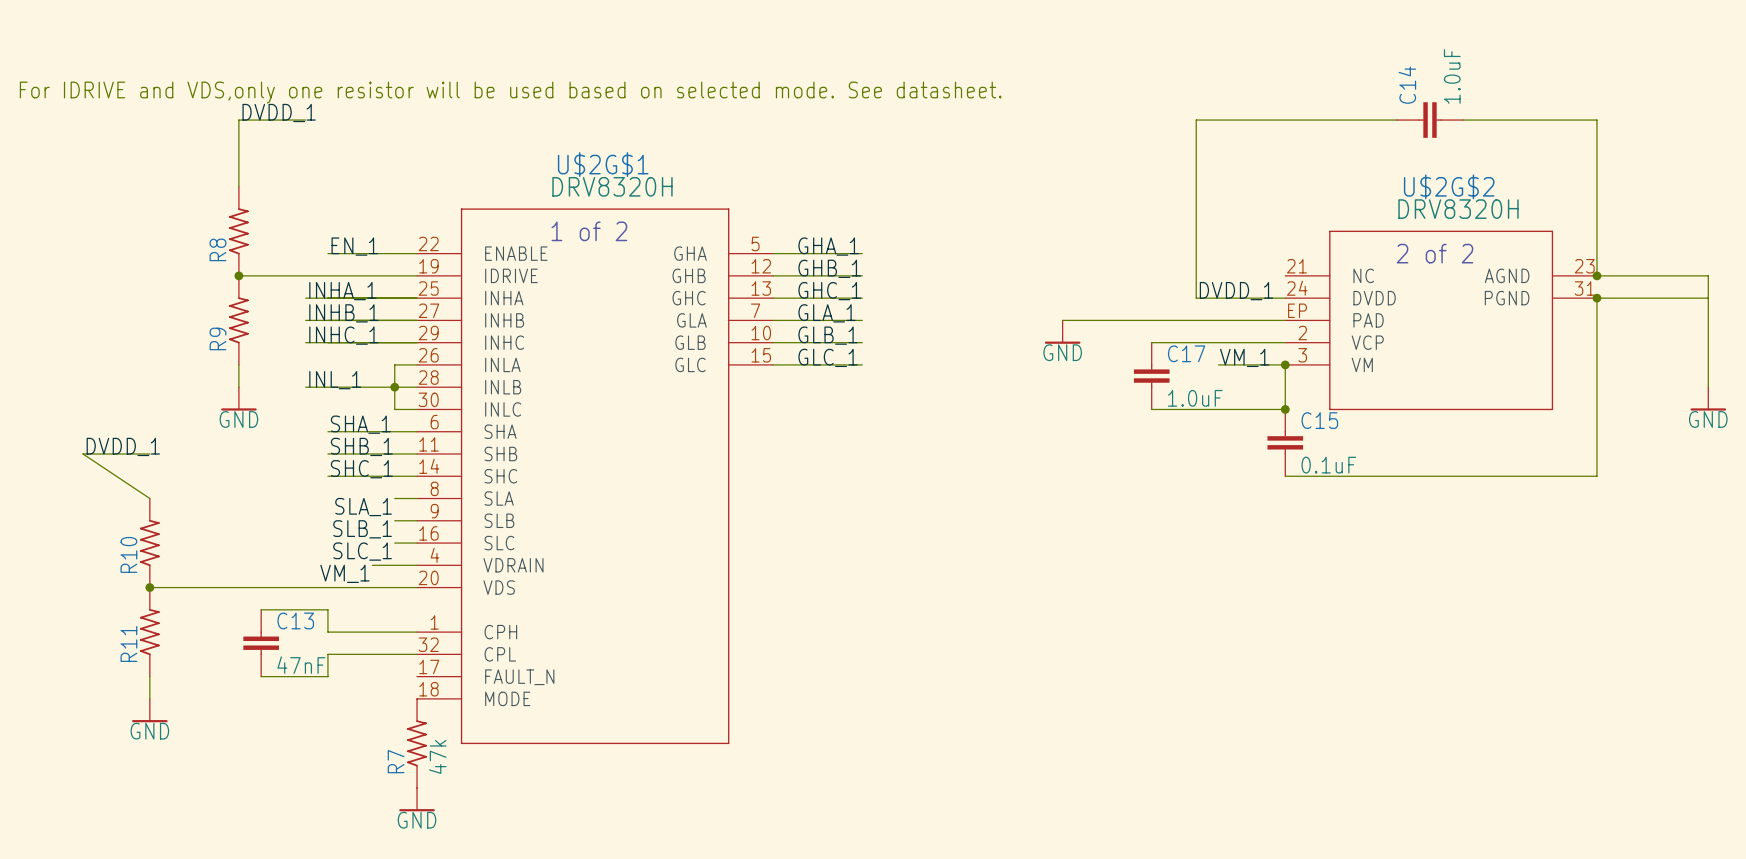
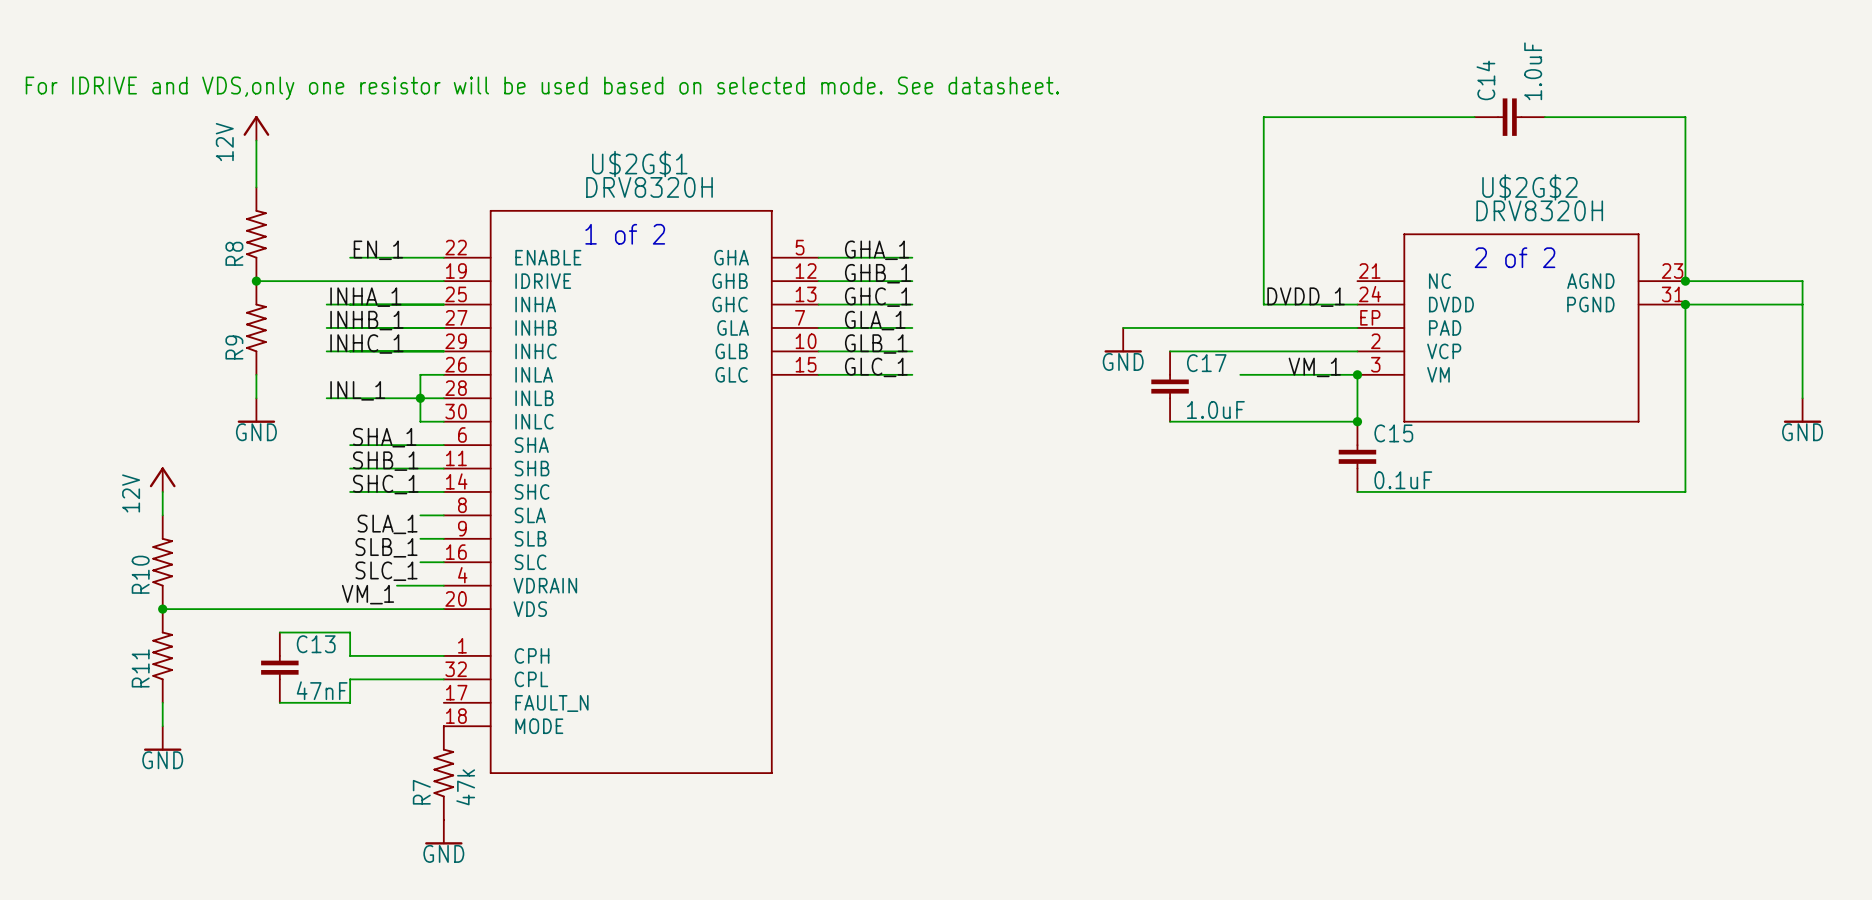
label: DVDD_1 (279, 112) -> none
wire: (305, 120) (238, 120) (238, 142) -> none
power symbol: none -> 12V (256, 128)
wire: none -> (1170, 351) (1216, 351)
wire: none -> (1240, 374) (1287, 374)
C17 position: (1151, 376) -> (1170, 386)
wire: none -> (1170, 421) (1216, 421)
label: DVDD_1 (123, 446) -> none
wire: (149, 453) (83, 453) (149, 498) -> (162, 491) (162, 515)
power symbol: none -> 12V (162, 479)

